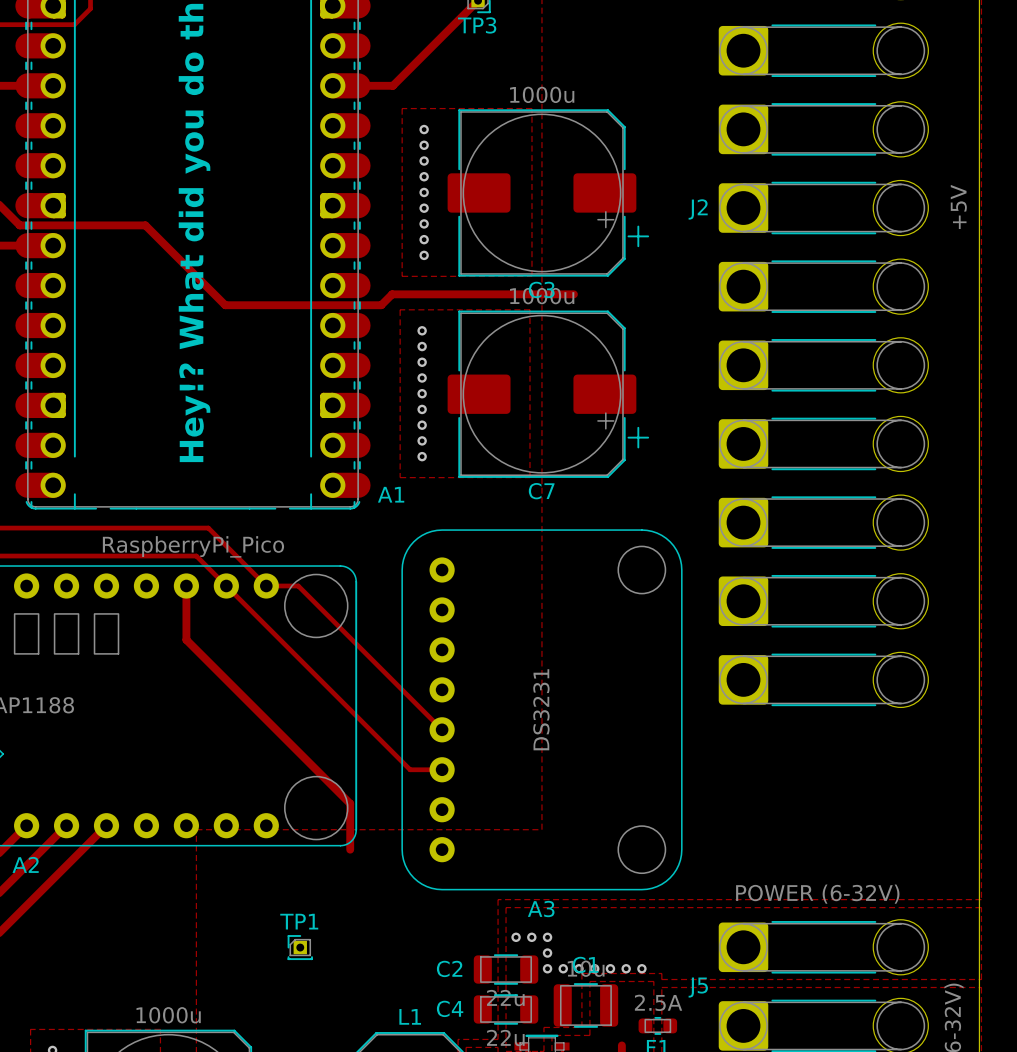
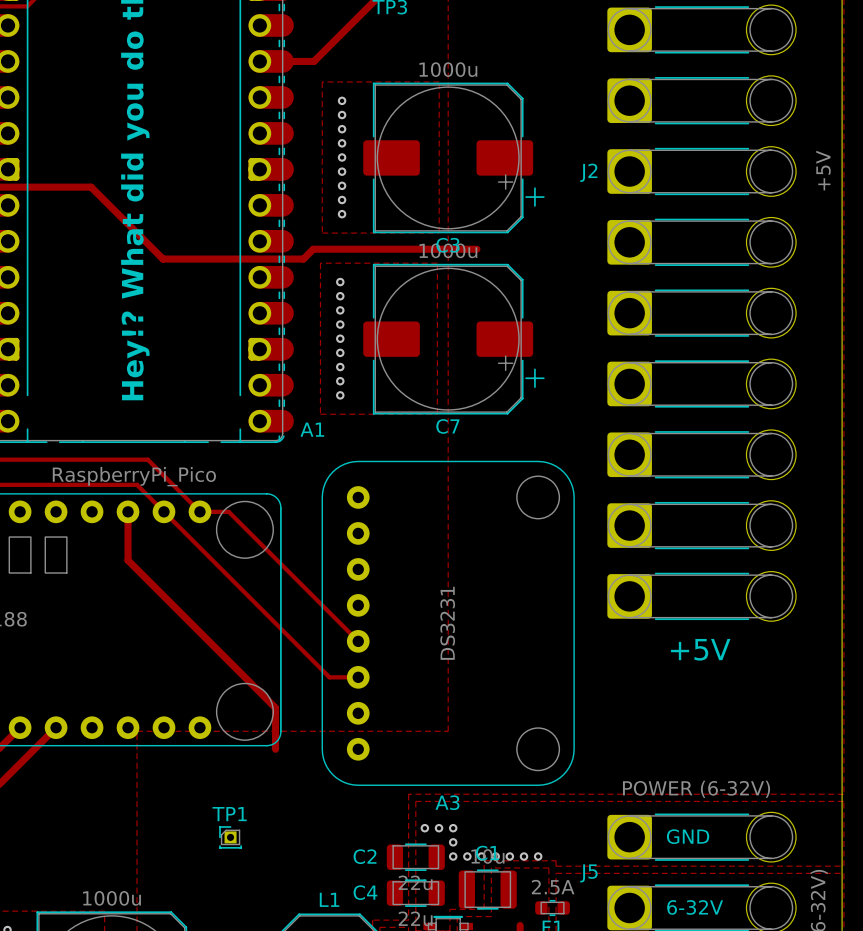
text: none -> +5V (700, 649)
text: none -> GND (688, 836)
text: none -> 6-32V (695, 907)

